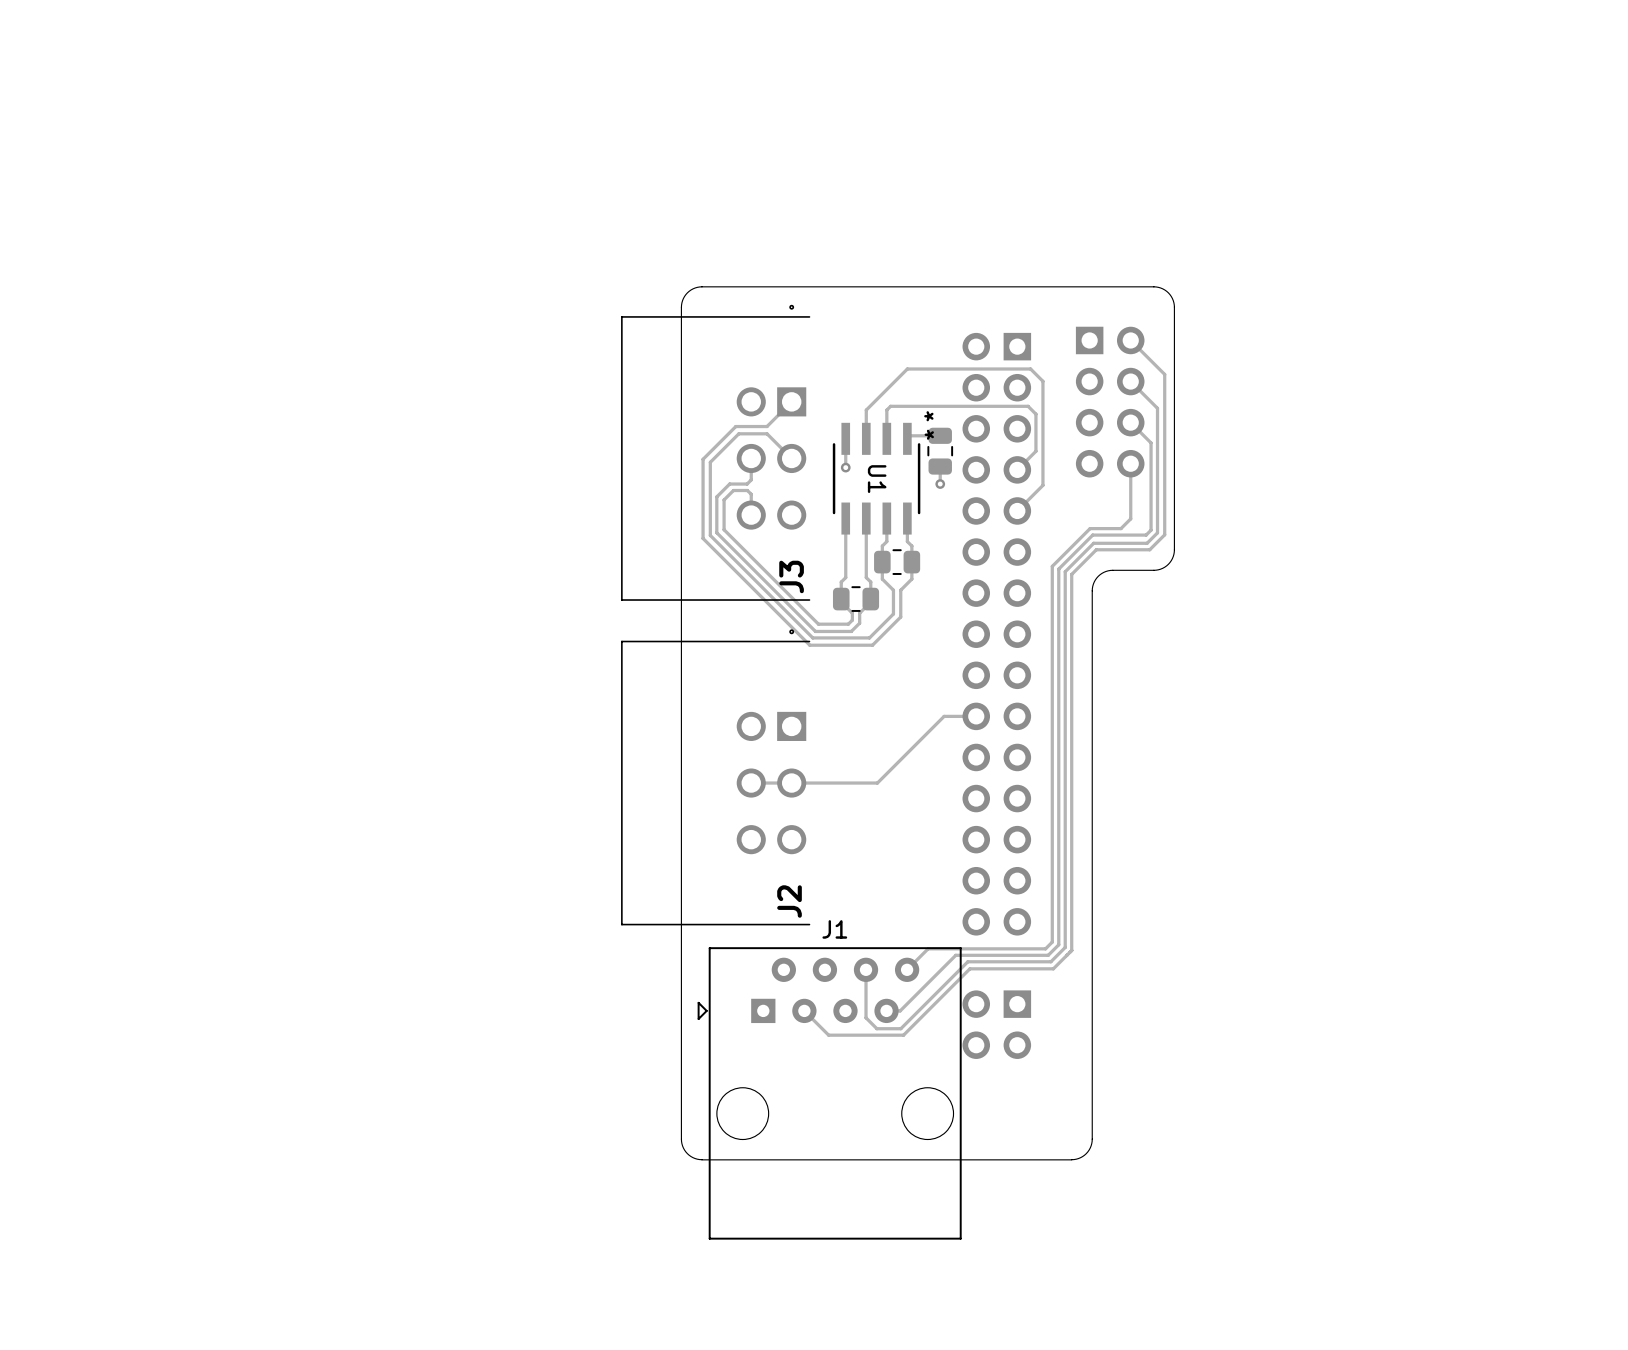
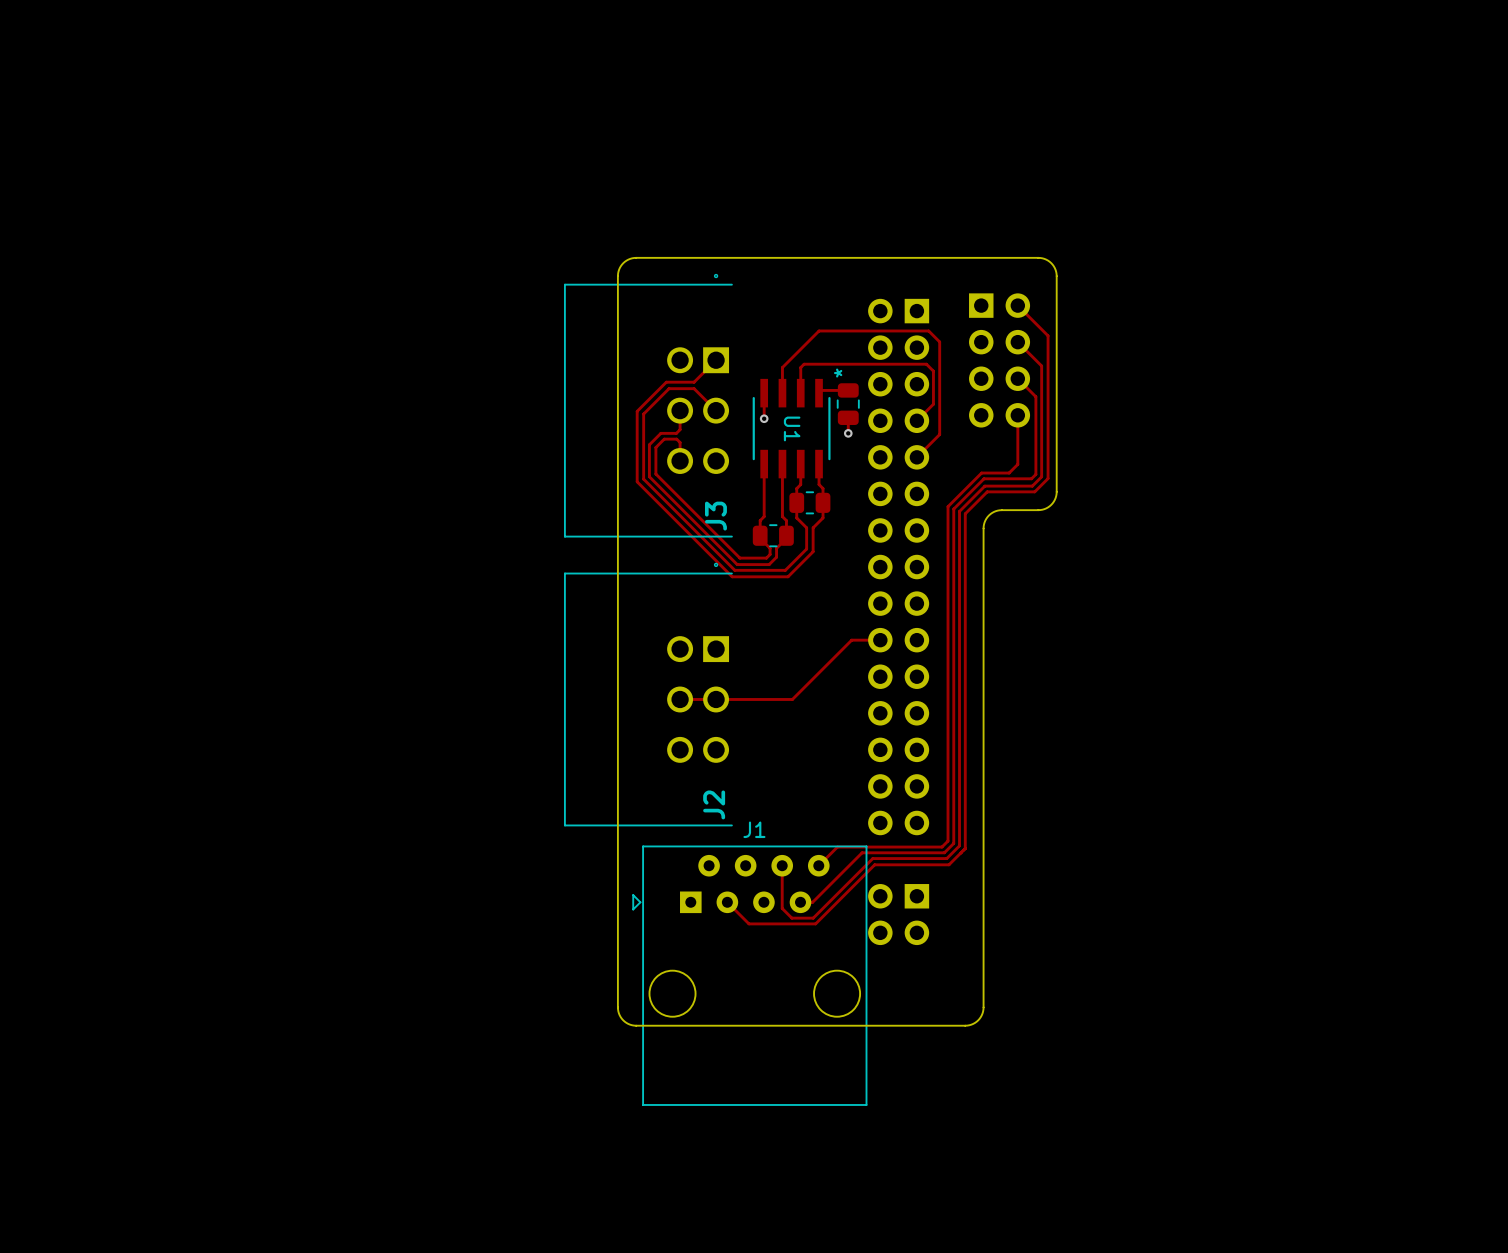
U1 text: * (929, 434) -> none
board edge: (681, 1129) (681, 1141) (684, 1150) (693, 1157) (701, 1159) -> (617, 1007) (623, 1020) (636, 1025) (965, 1025) (978, 1020) (983, 1007)
board edge: (1092, 1129) (1092, 1141) (1089, 1150) (1080, 1157) (1071, 1159) -> none
board edge: (701, 1159) (1071, 1159) -> none

